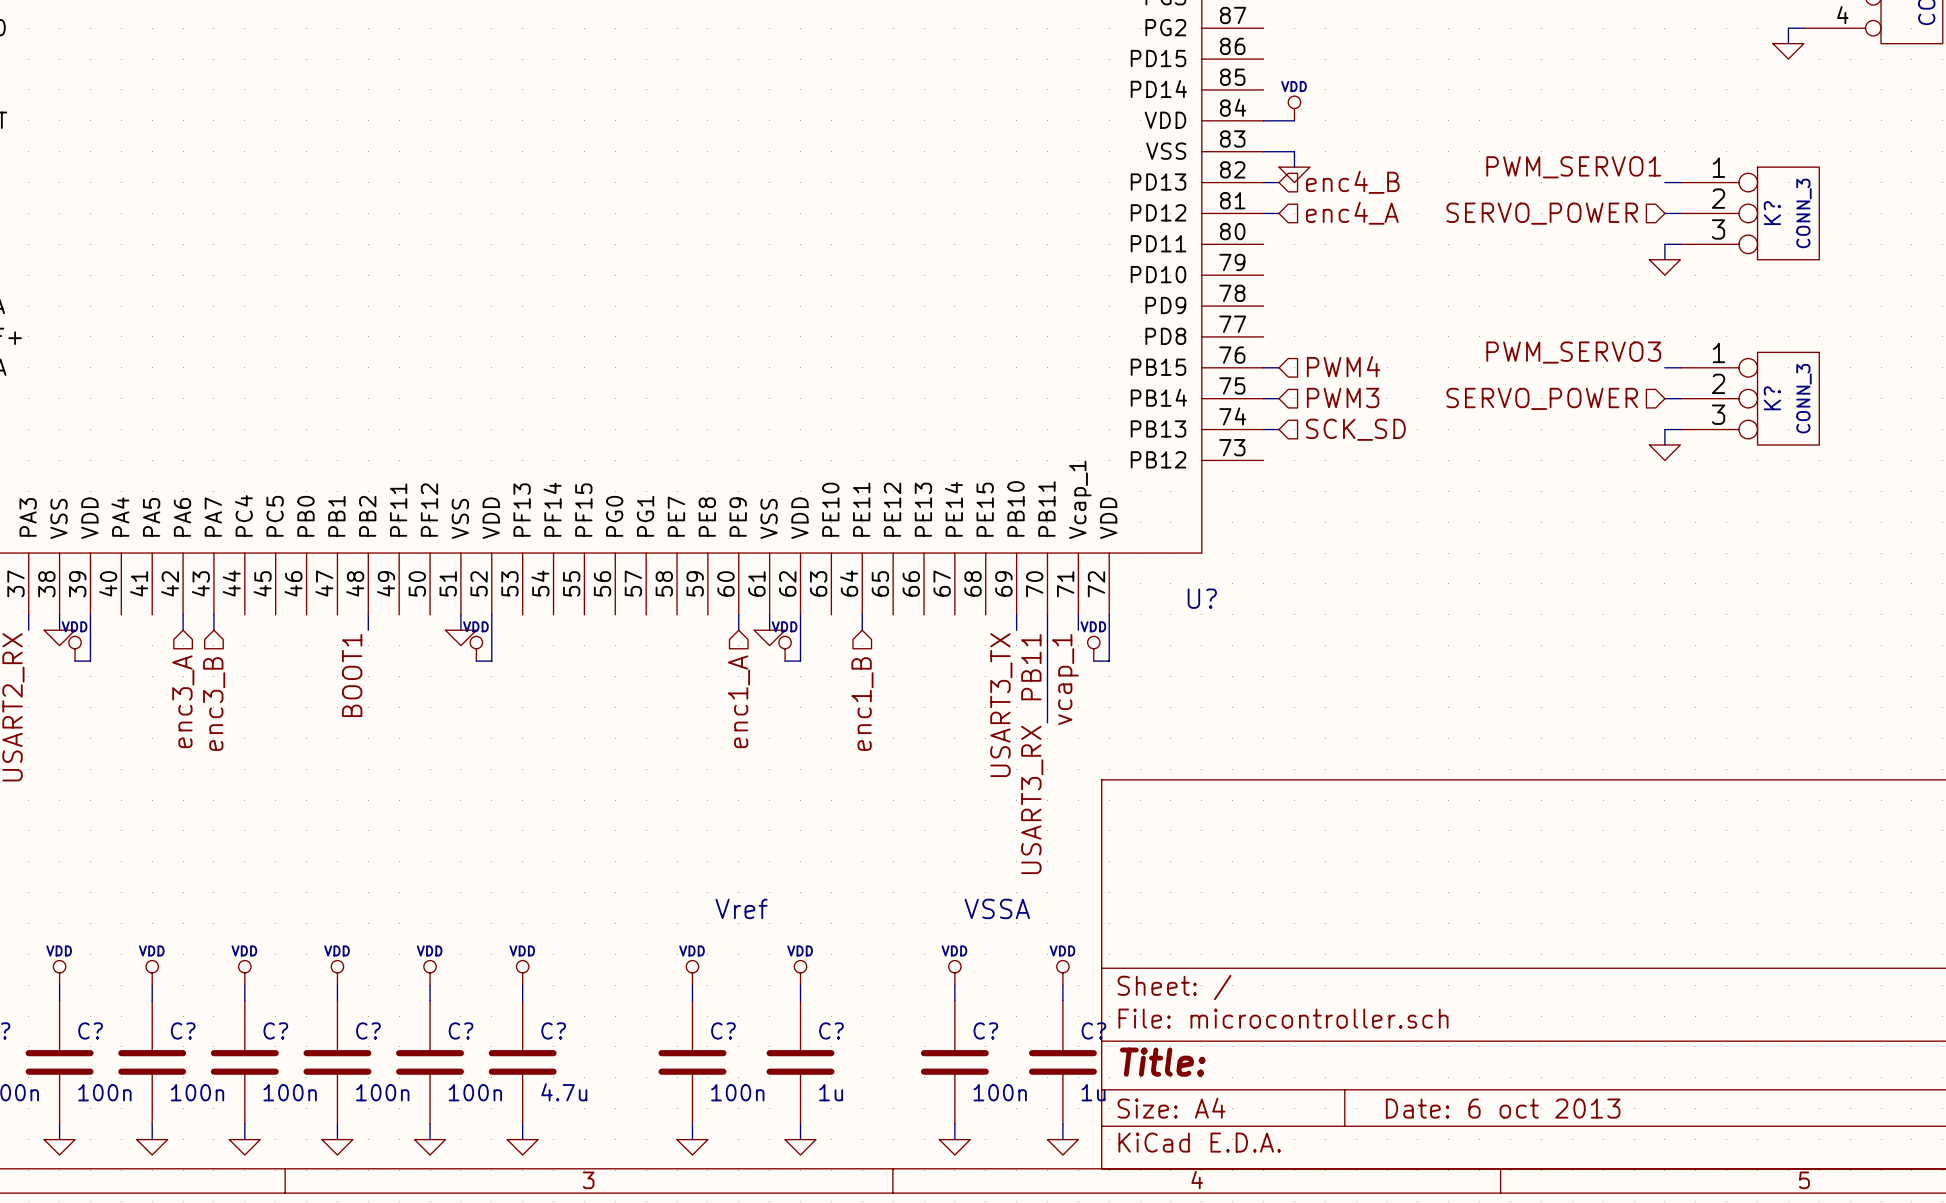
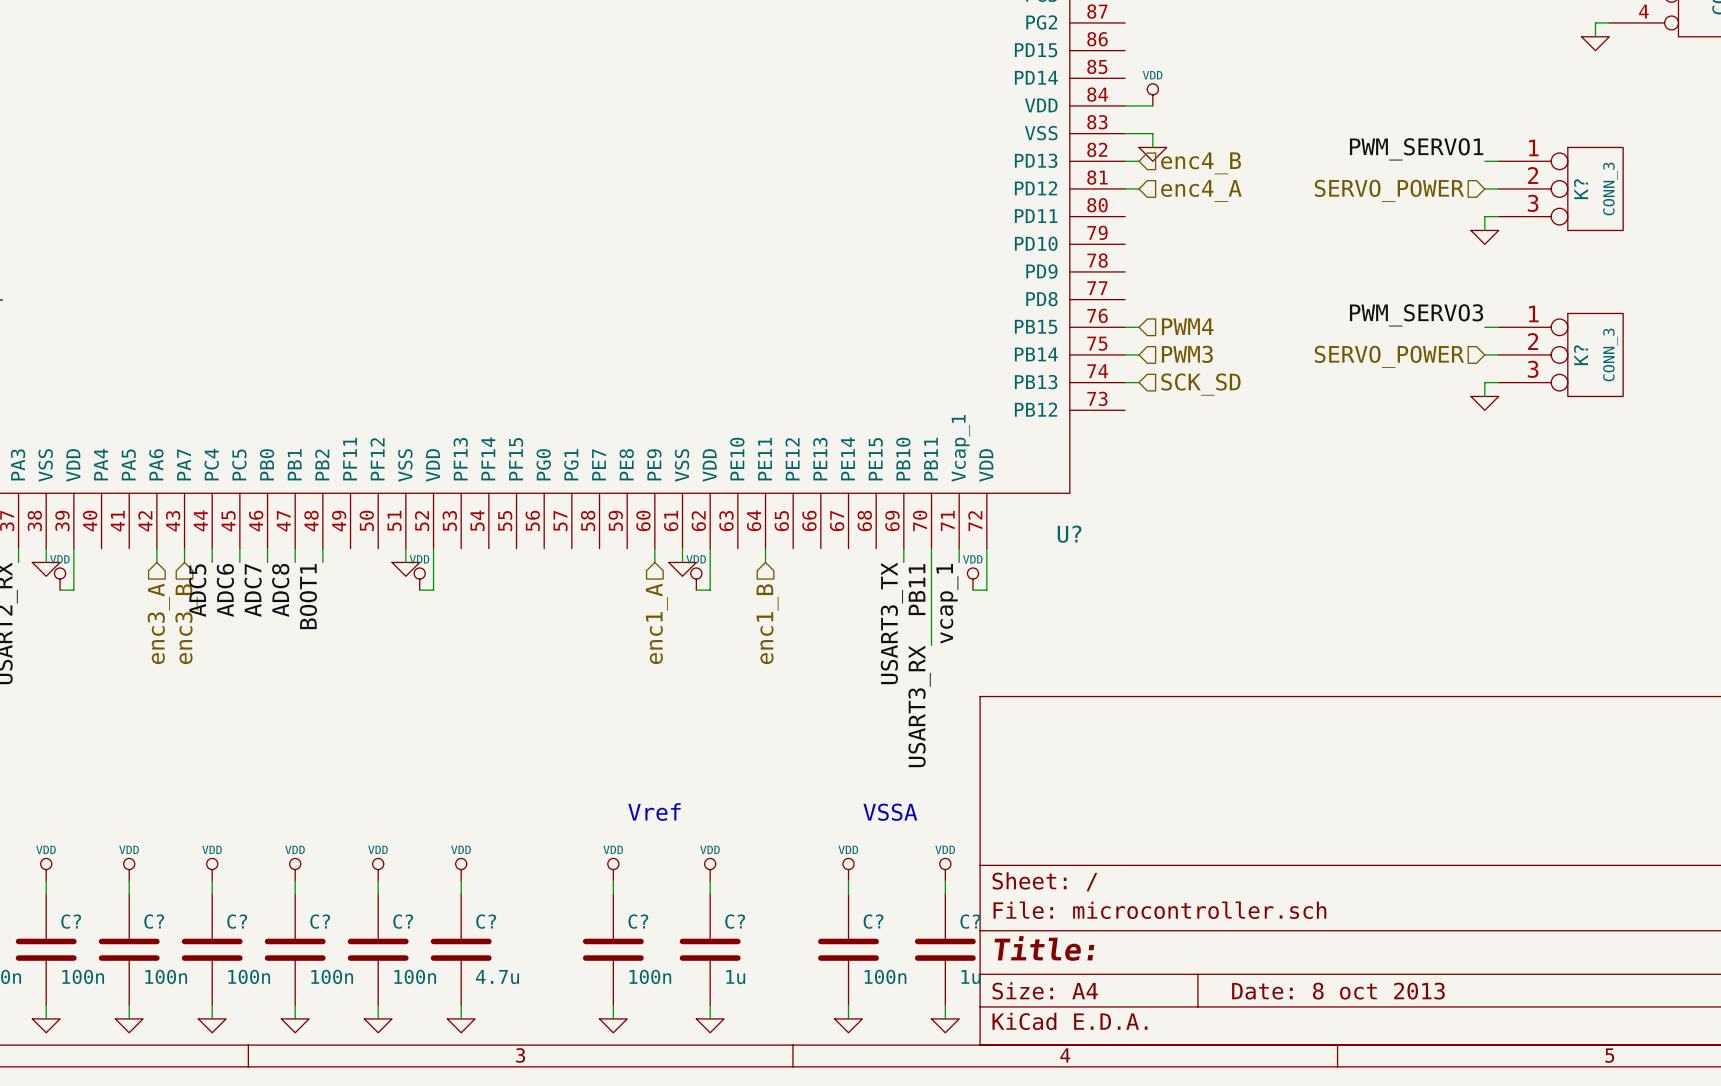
wire: none -> (212, 548) (212, 562)
wire: none -> (239, 548) (239, 562)
wire: none -> (267, 548) (267, 562)
wire: none -> (295, 548) (295, 562)
label: none -> ADC5 (197, 590)
label: none -> ADC6 (225, 590)
label: none -> ADC7 (253, 590)
label: none -> ADC8 (280, 590)
title block: Date: 6 oct 2013 (1503, 1108) -> Date: 8 oct 2013 (1338, 991)

